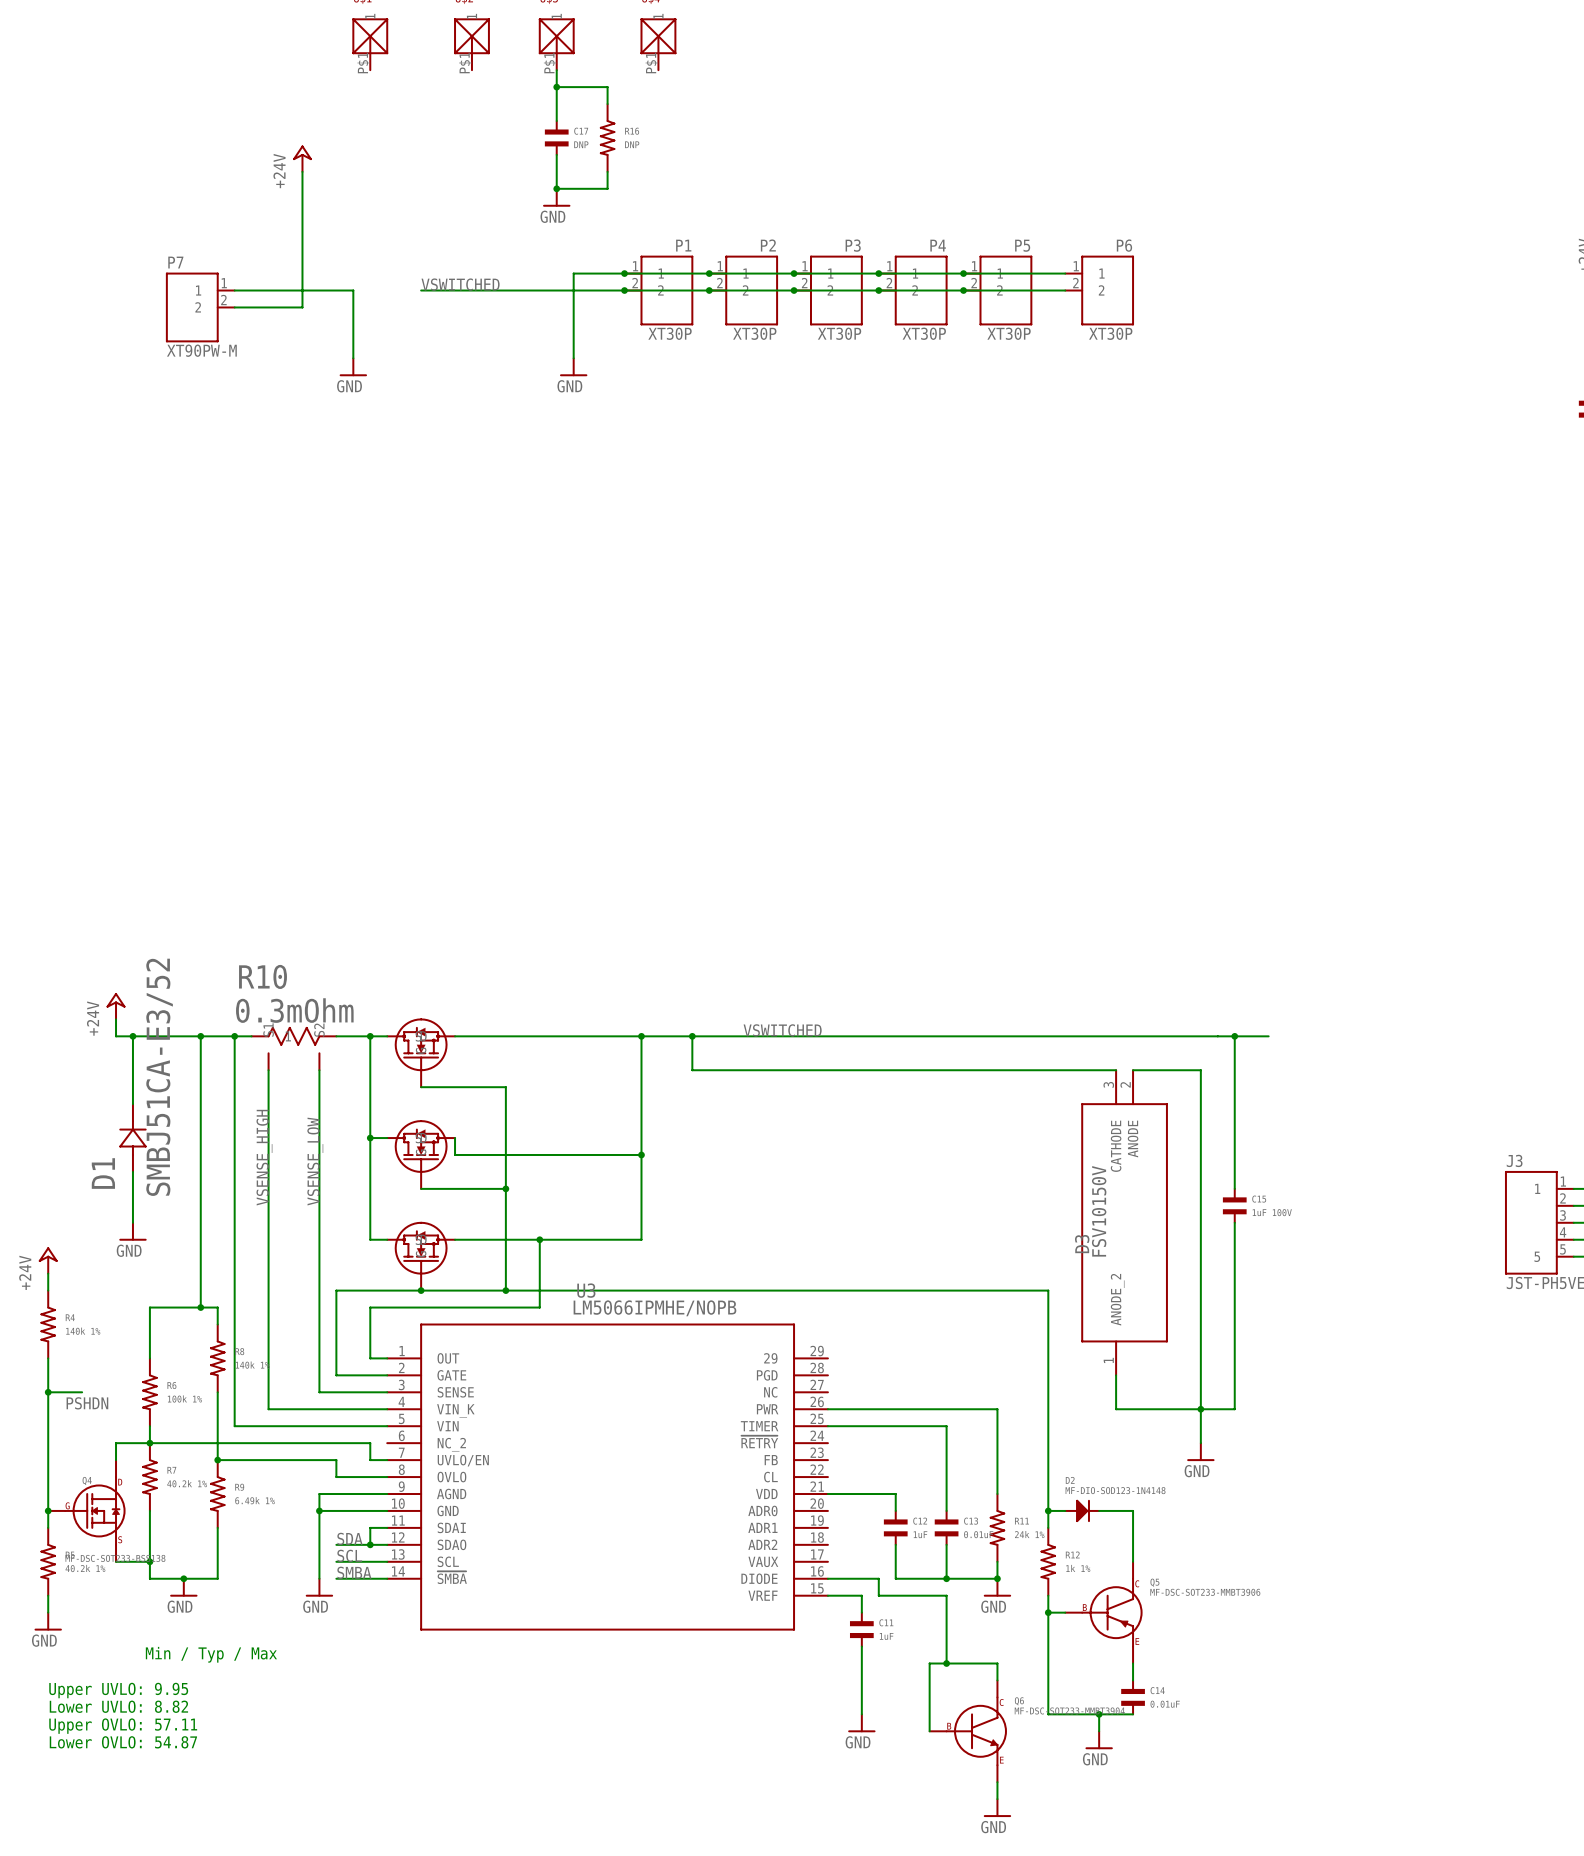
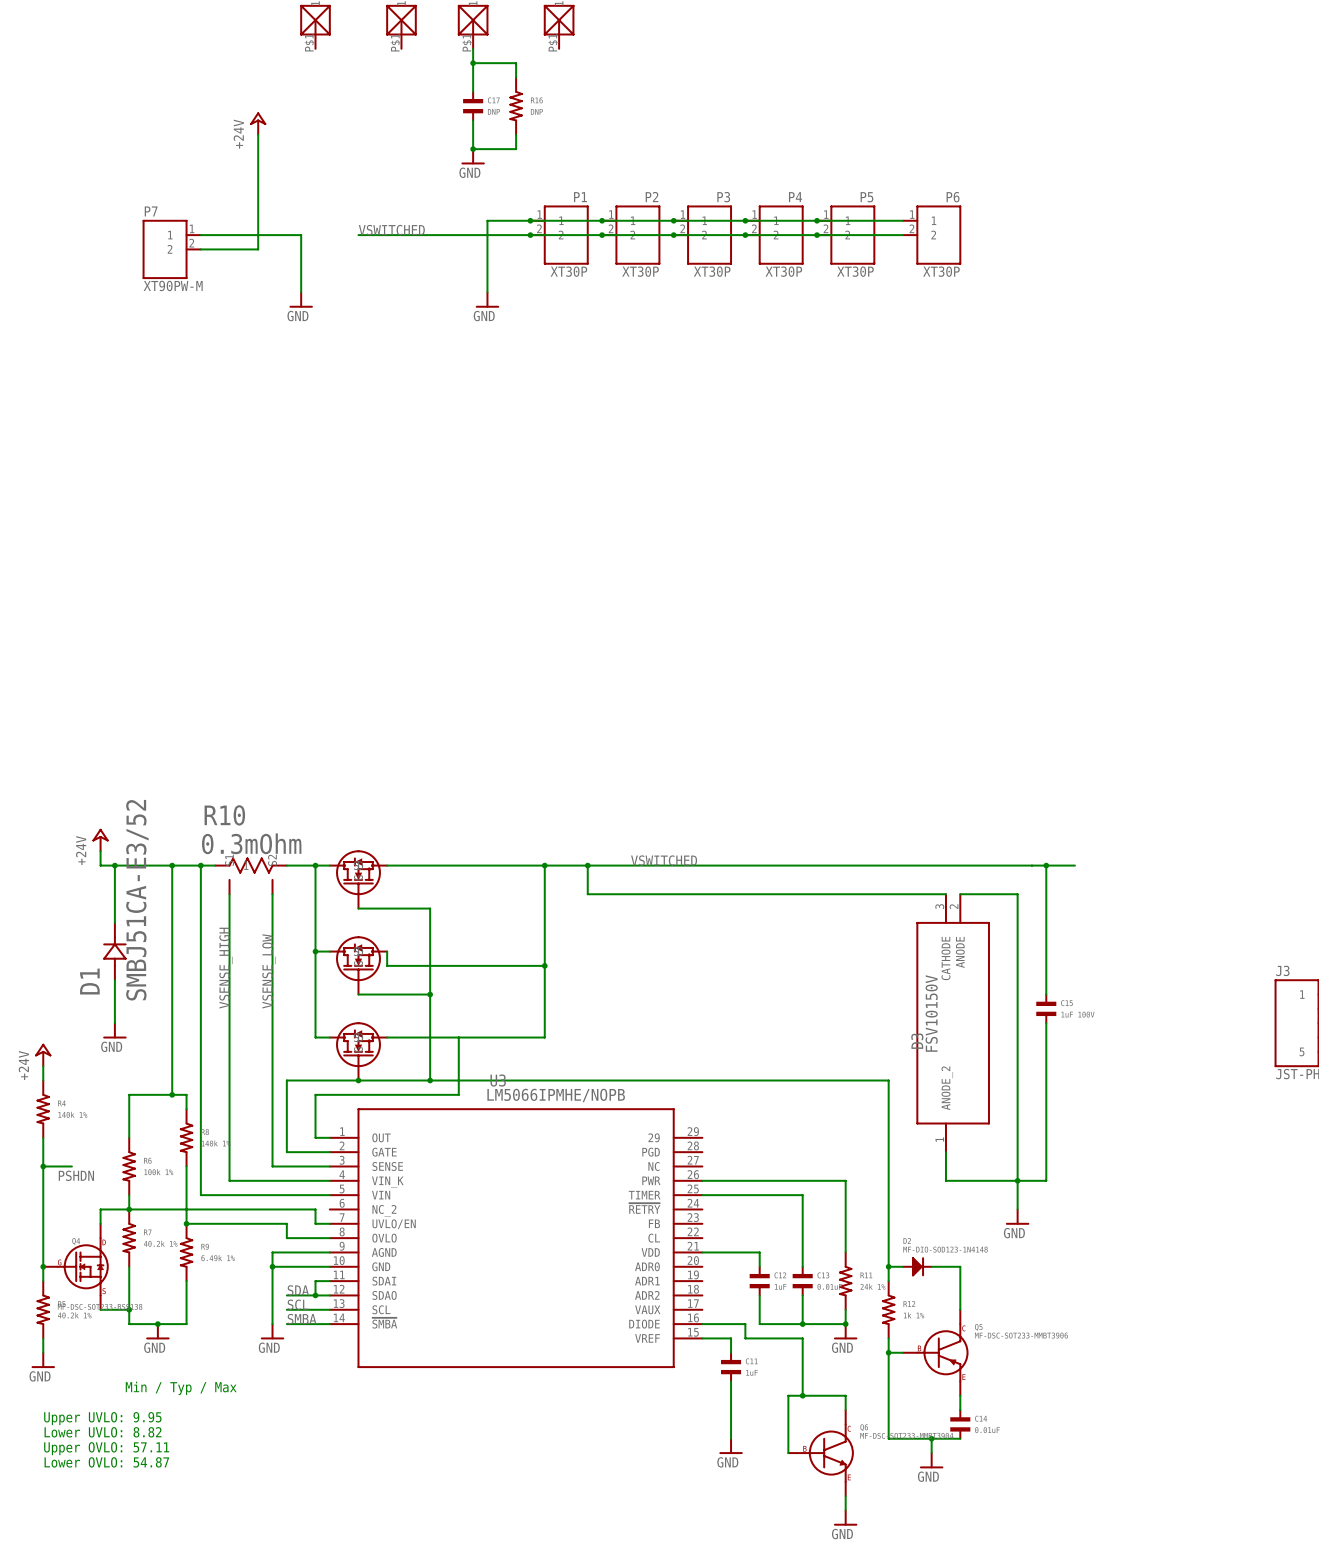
junction: (539, 1239) -> none

